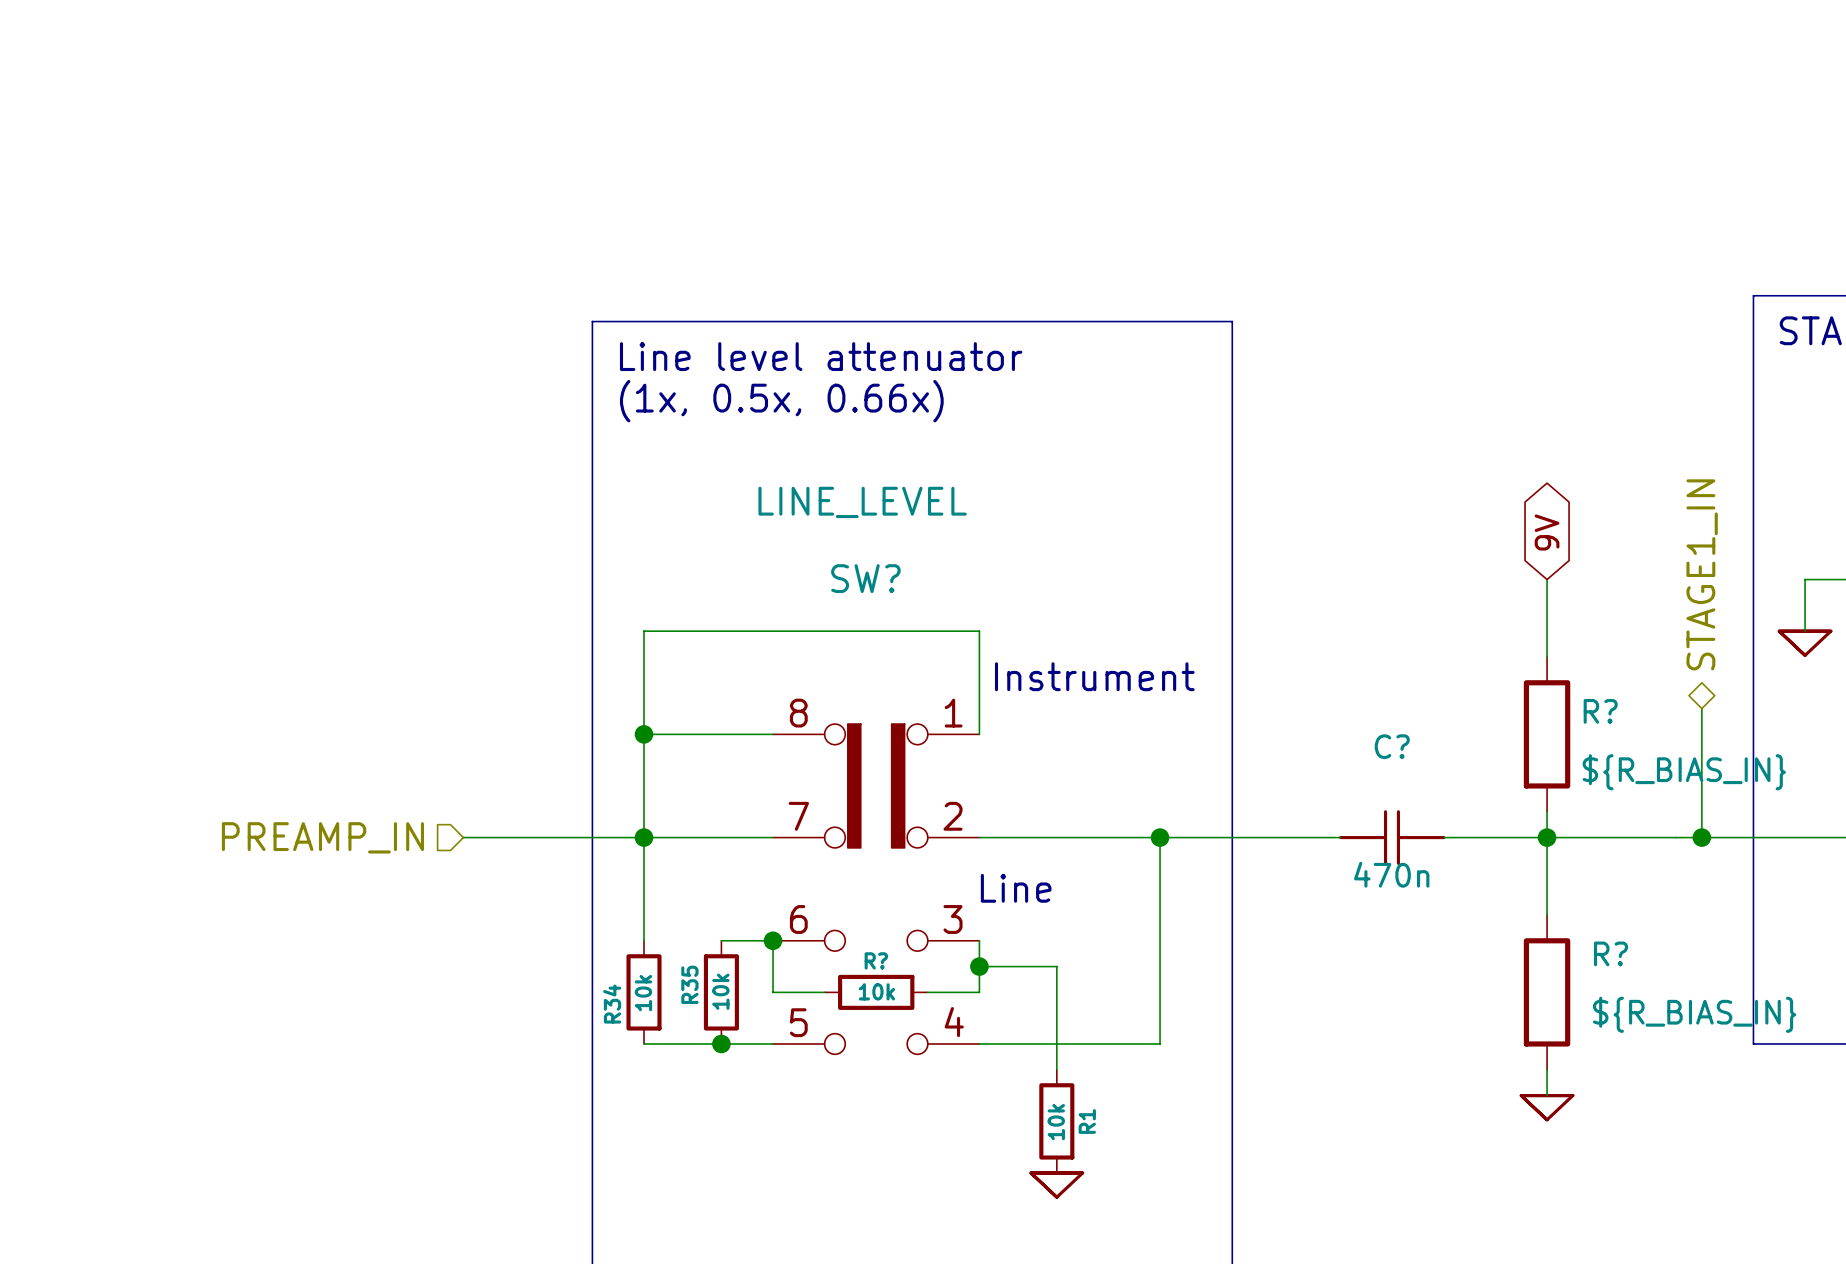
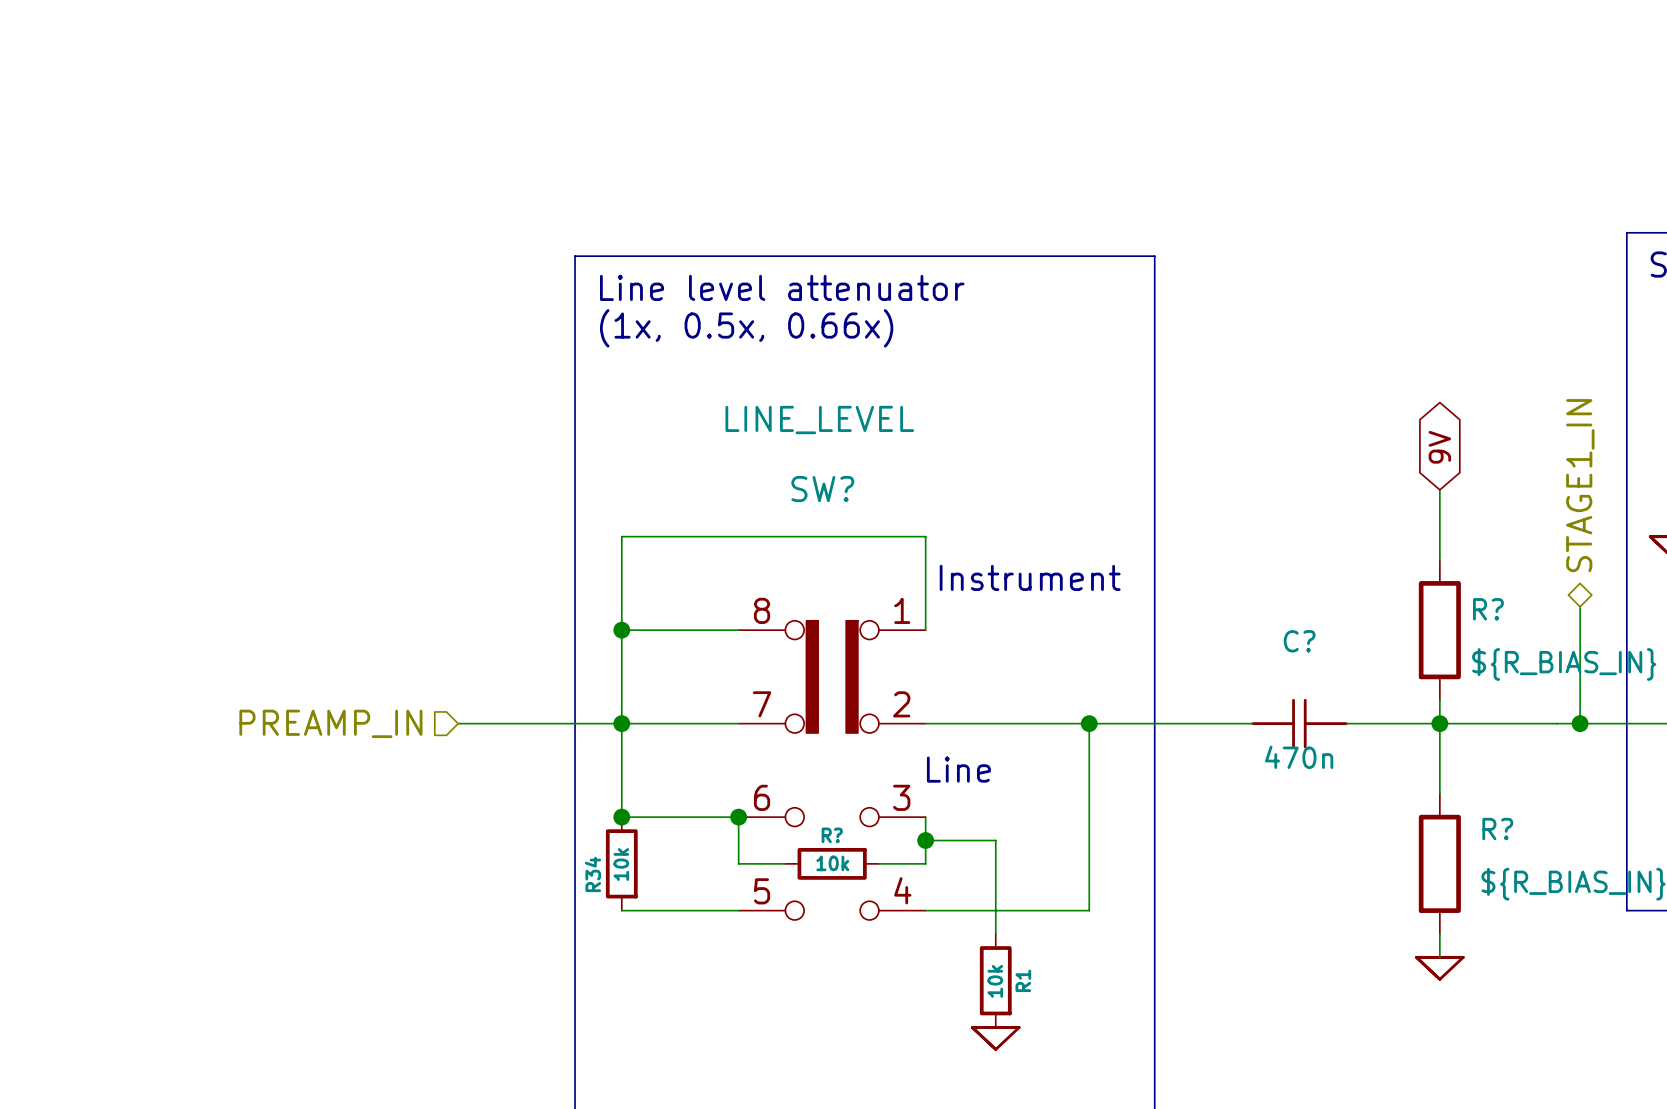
wire: none -> (621, 817) (691, 817)
junction: none -> (621, 817)
R35: 10k (721, 992) -> none
junction: (721, 1043) -> none

